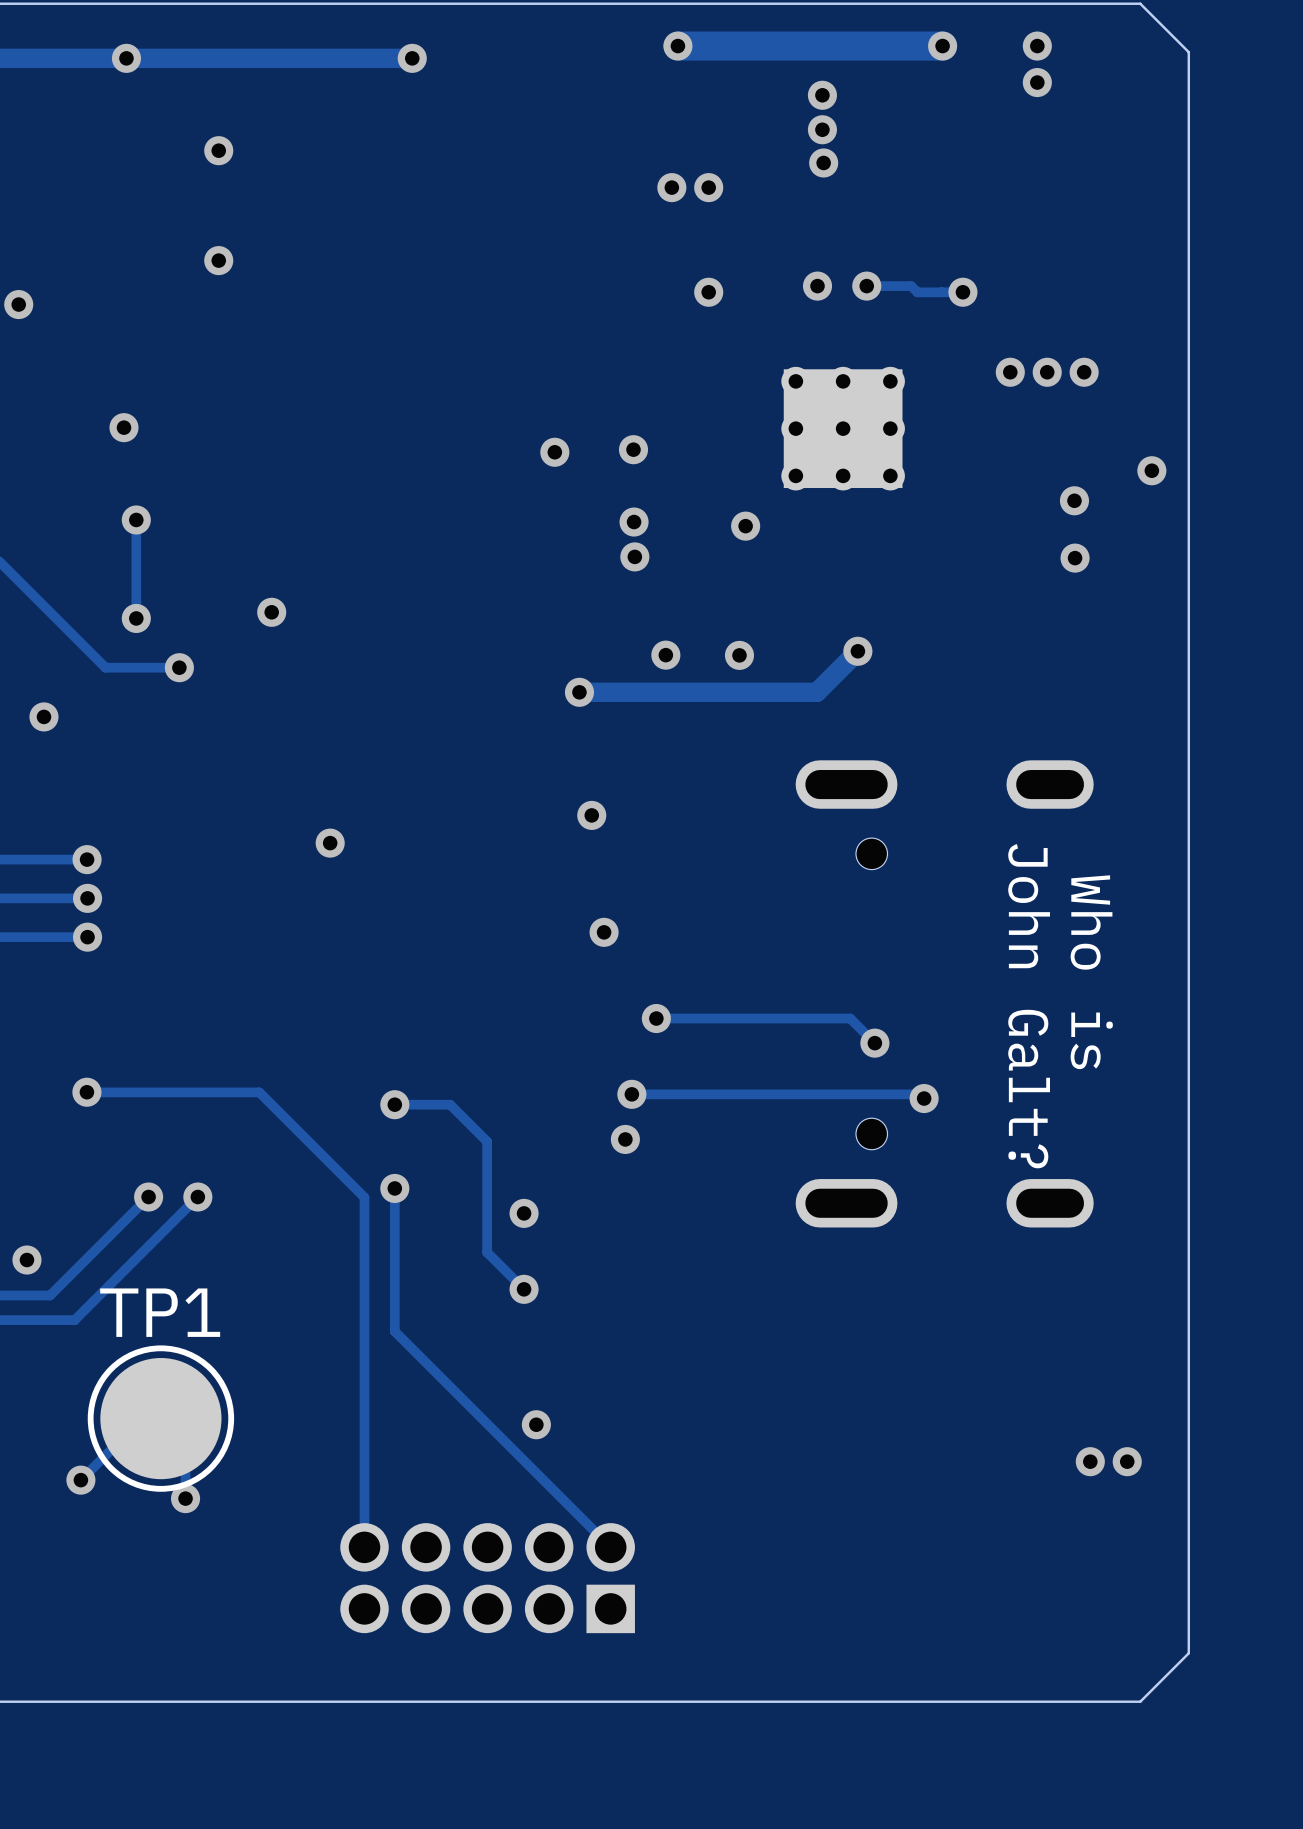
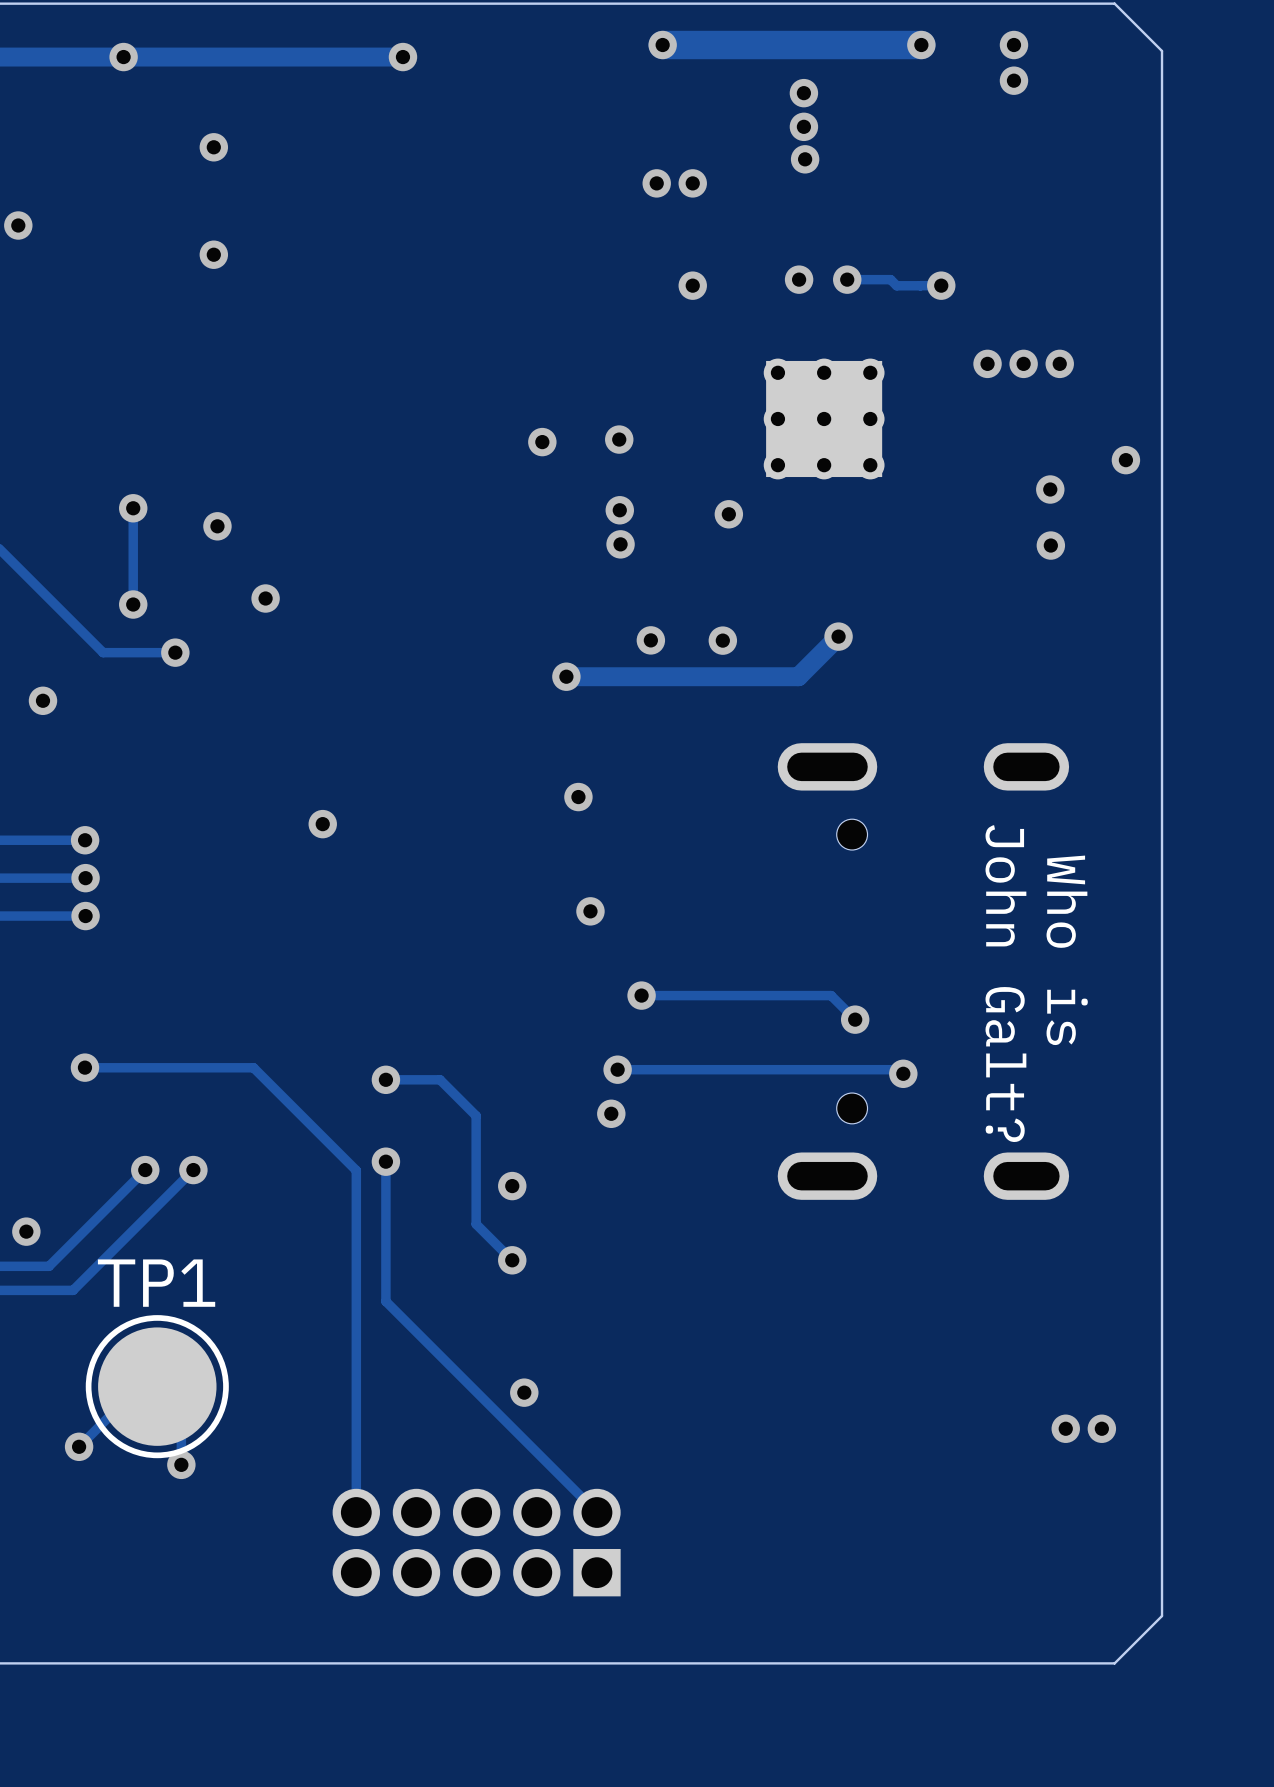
via position: (18, 304) -> (18, 225)
via: (123, 427) -> none
via: none -> (217, 526)

